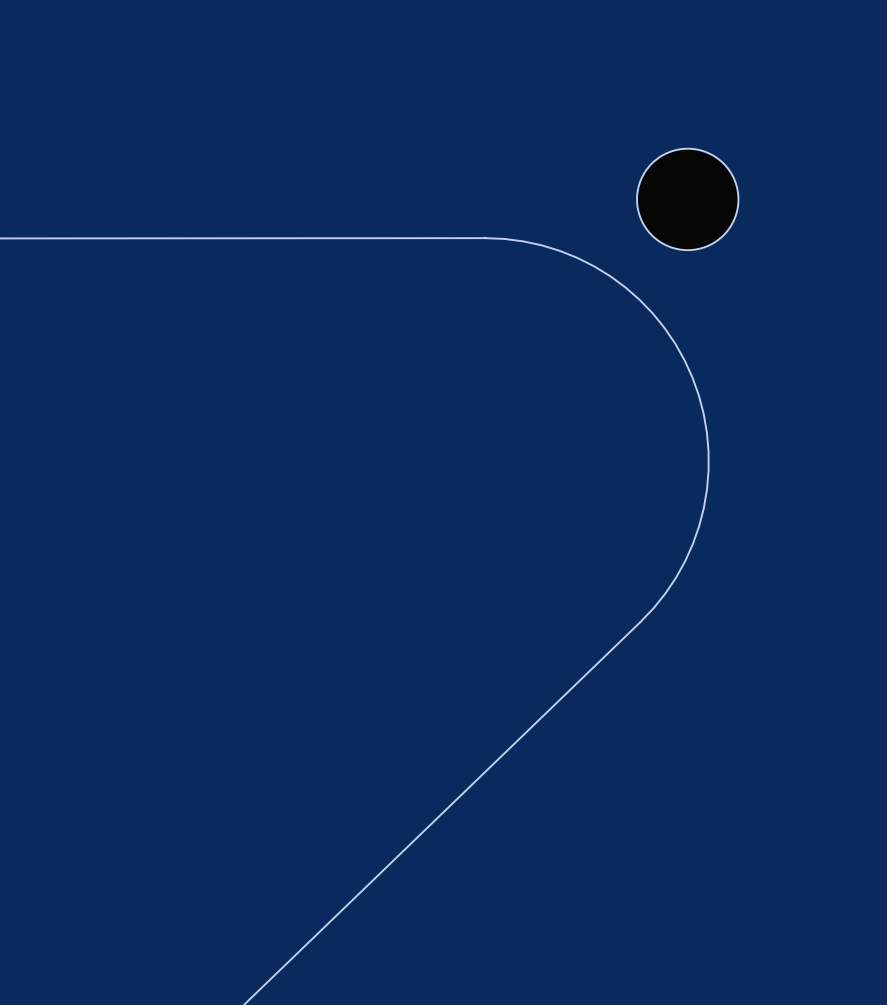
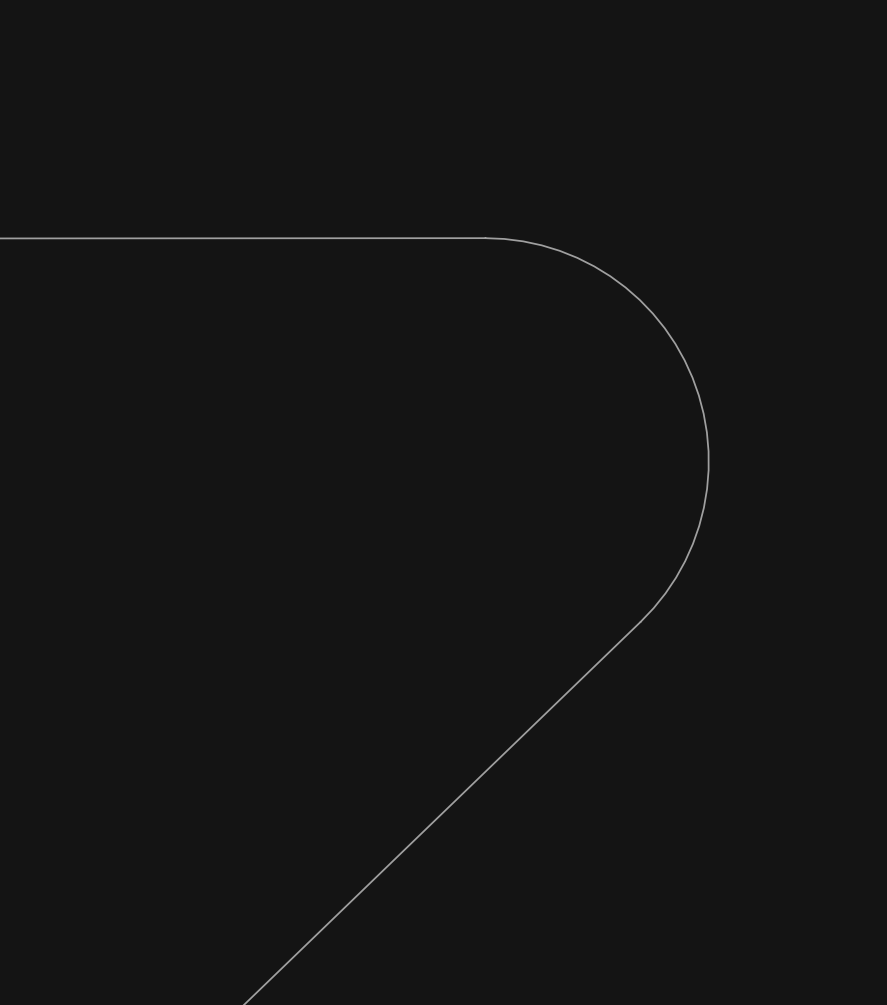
hole: (687, 199) -> none

